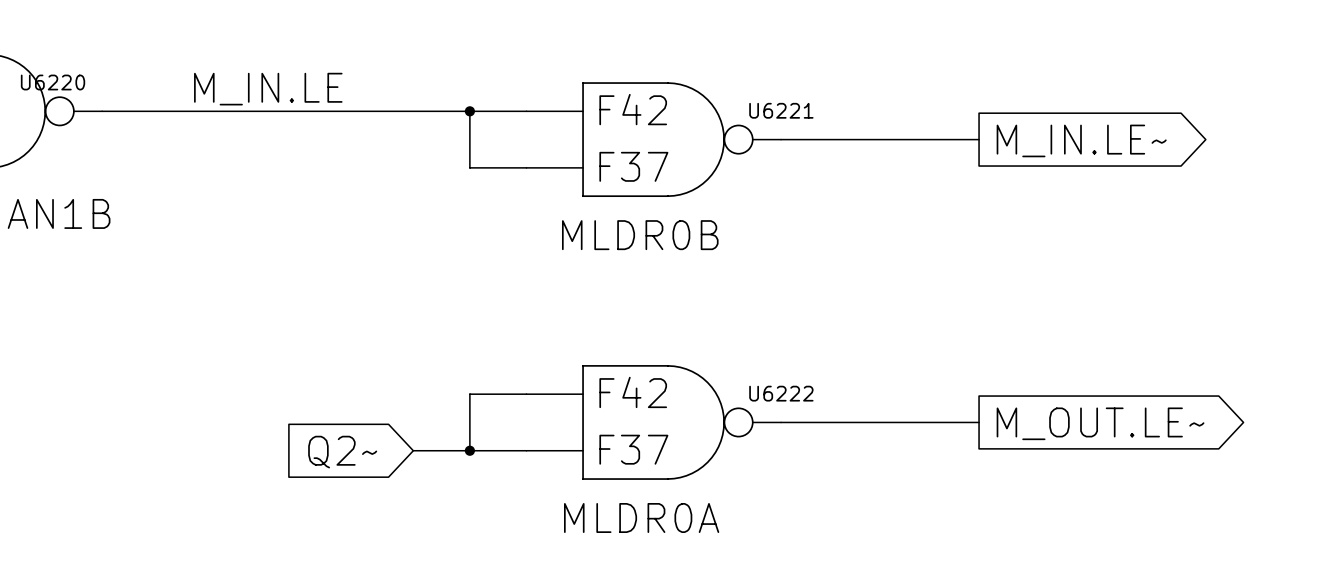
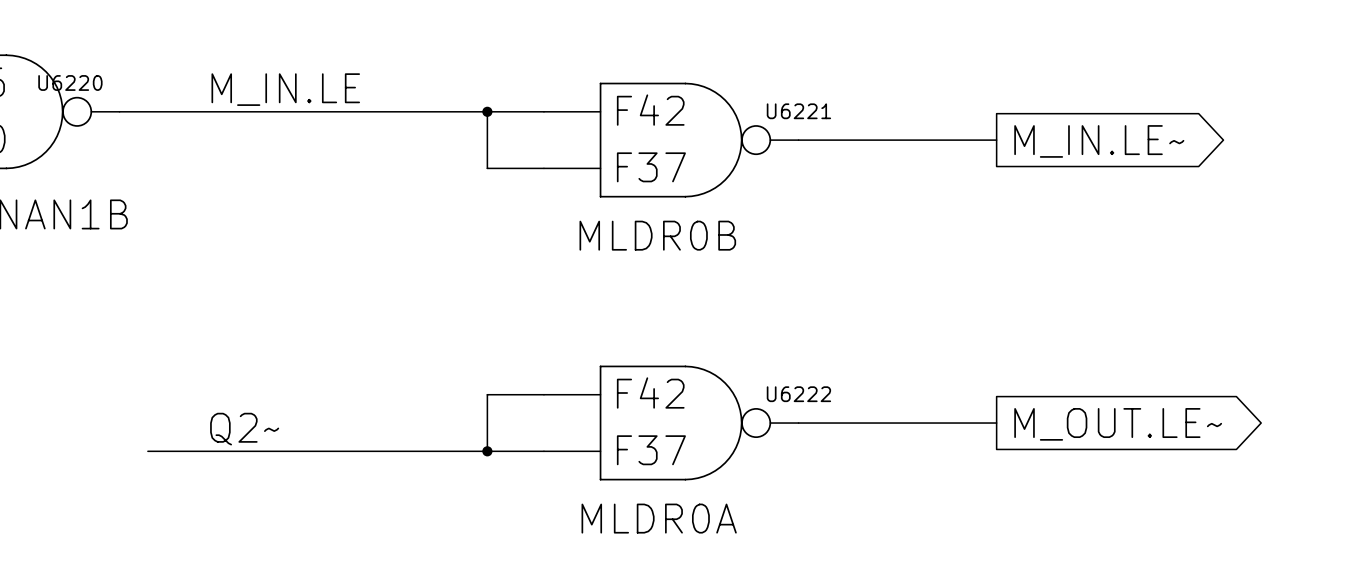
label: none -> Q2~ (244, 429)
wire: none -> (147, 451) (430, 451)
global label: Q2~ (342, 452) -> none

